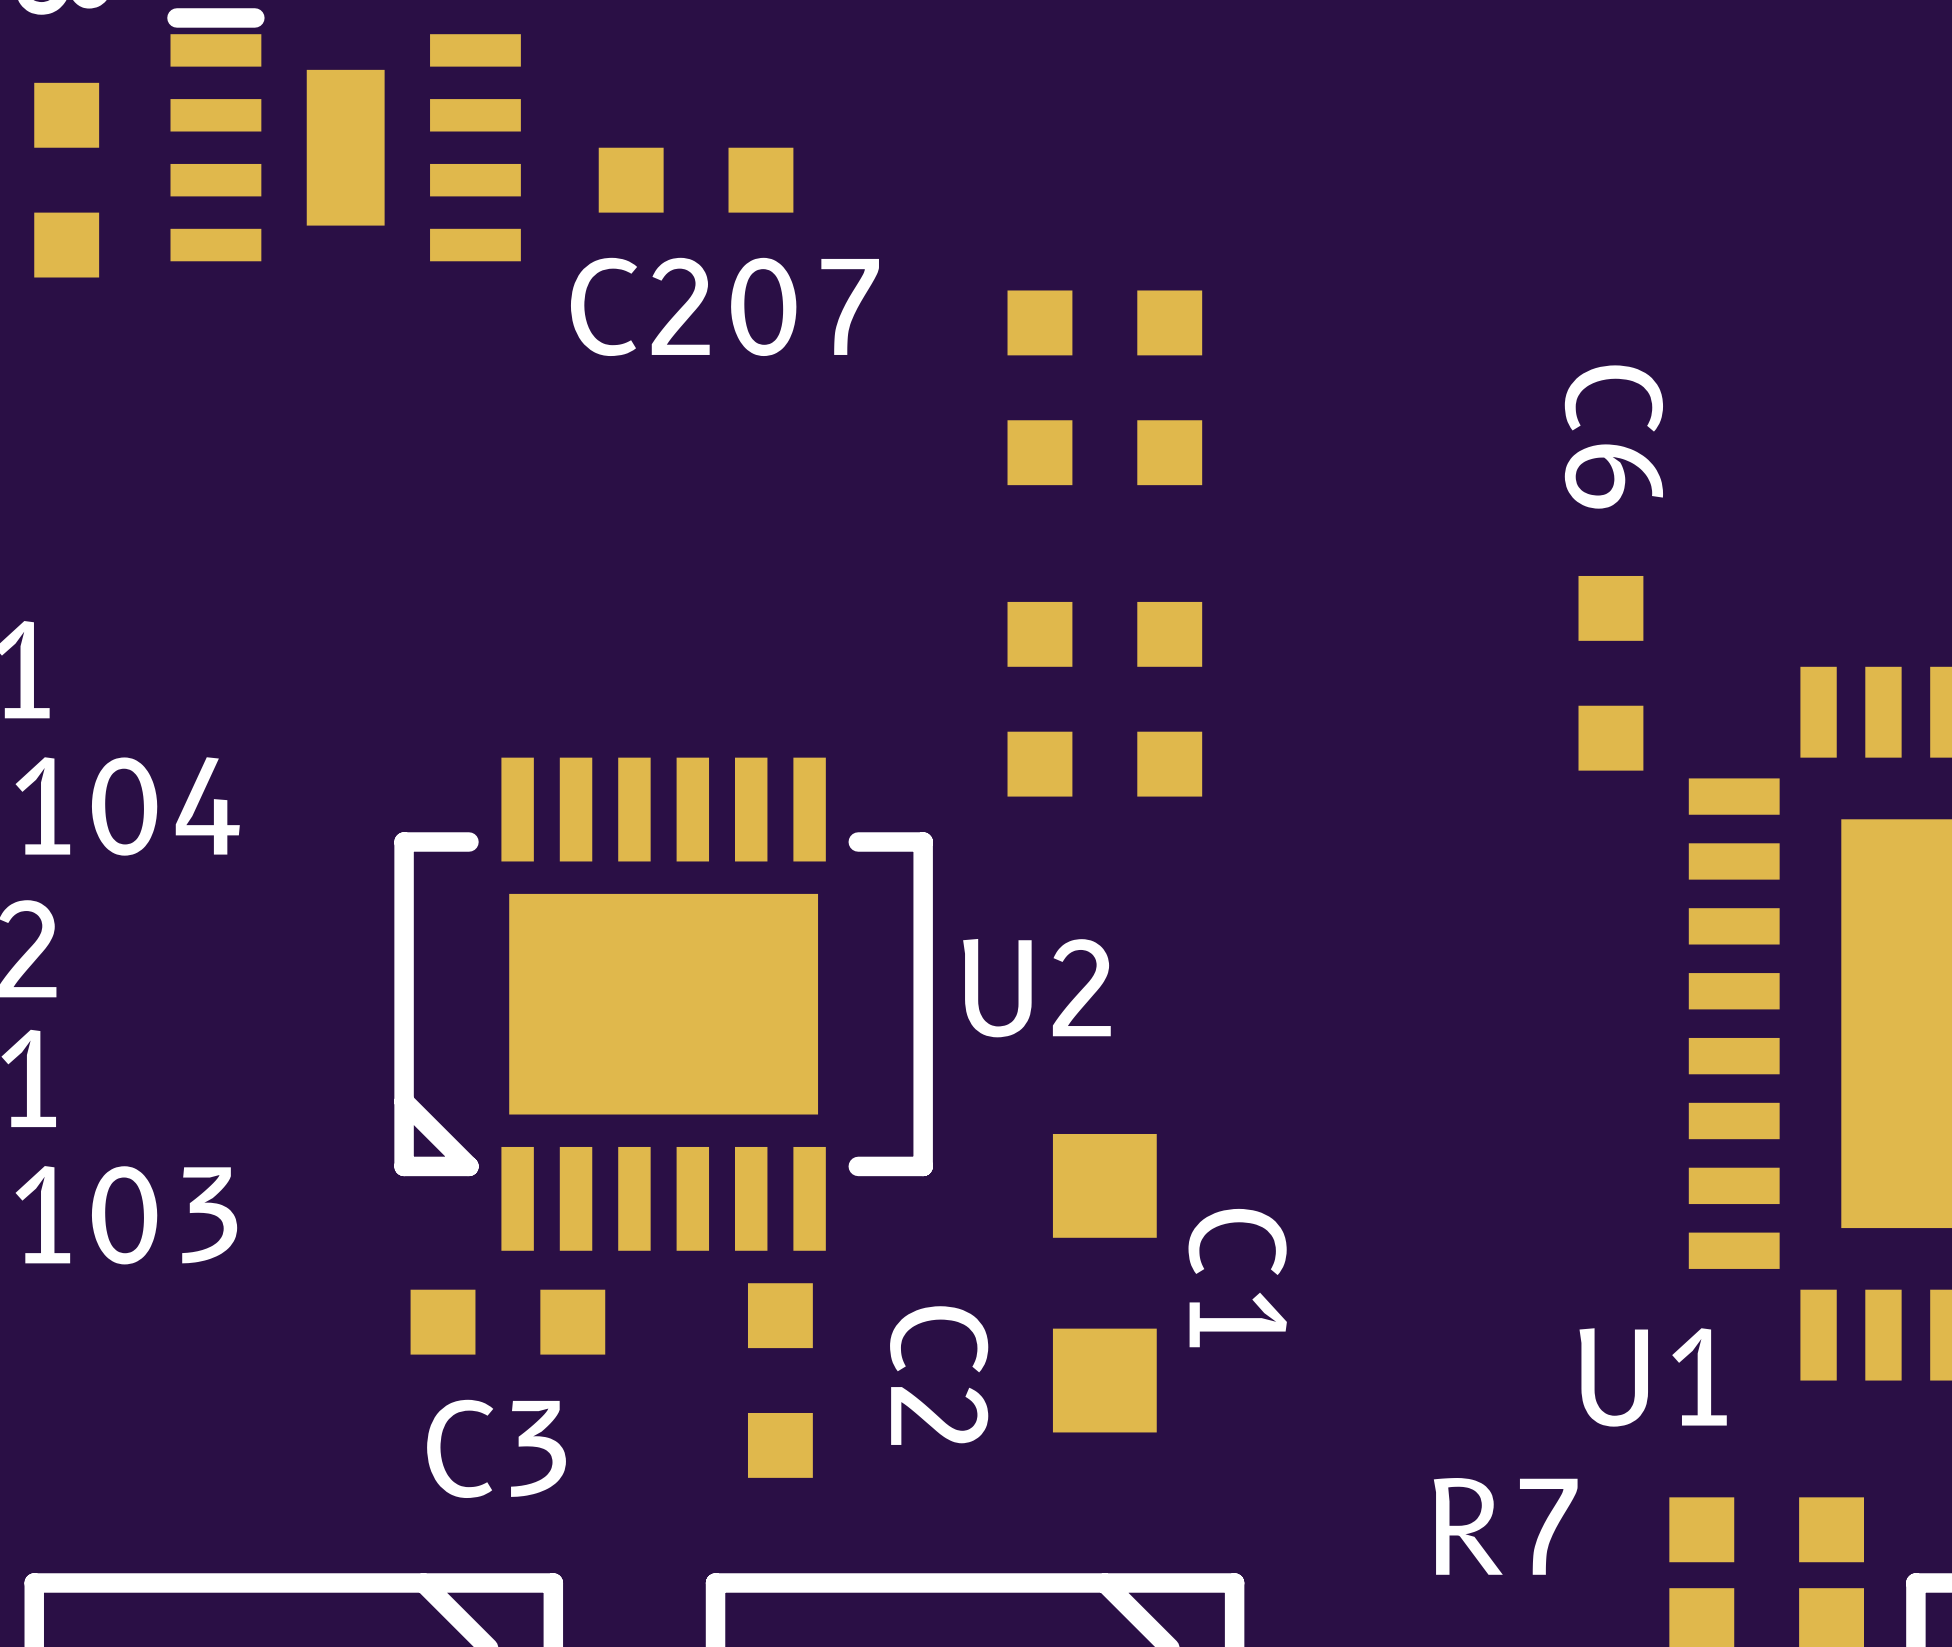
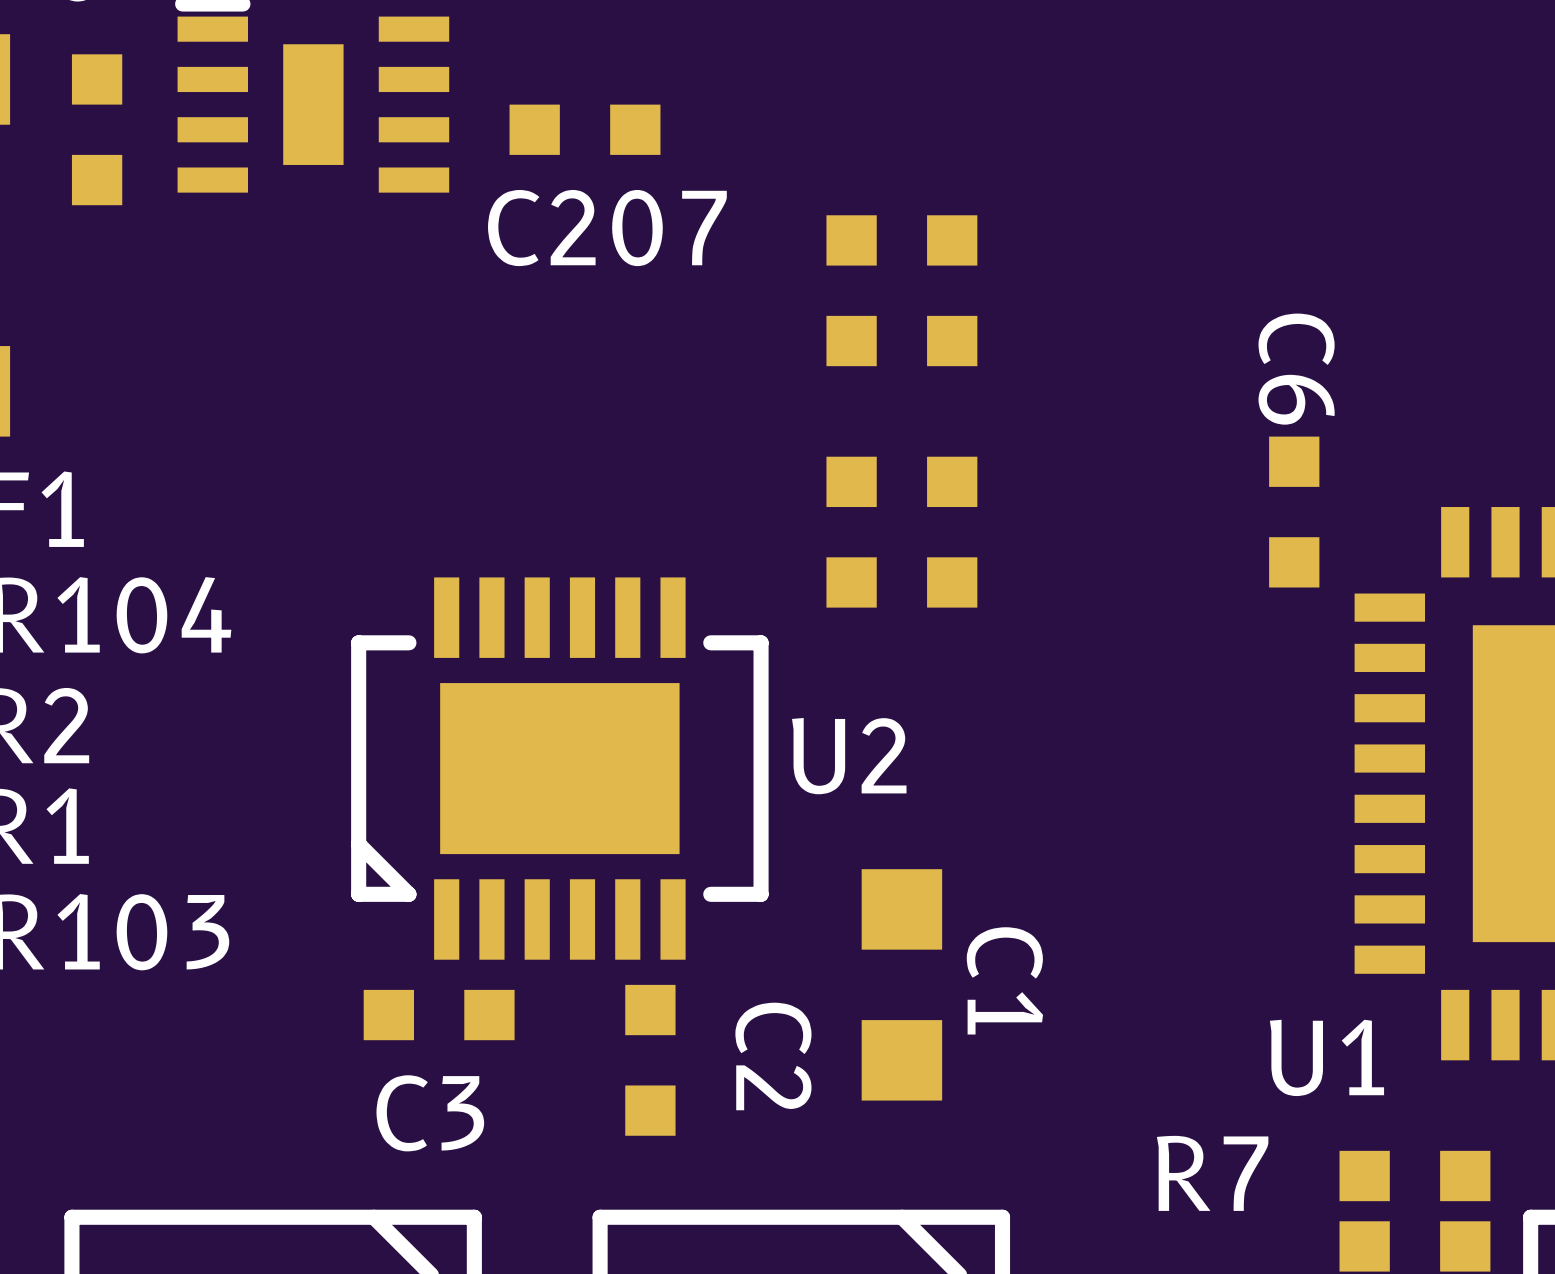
C6 name position: C6 (1613, 437) -> C6 (1296, 369)

